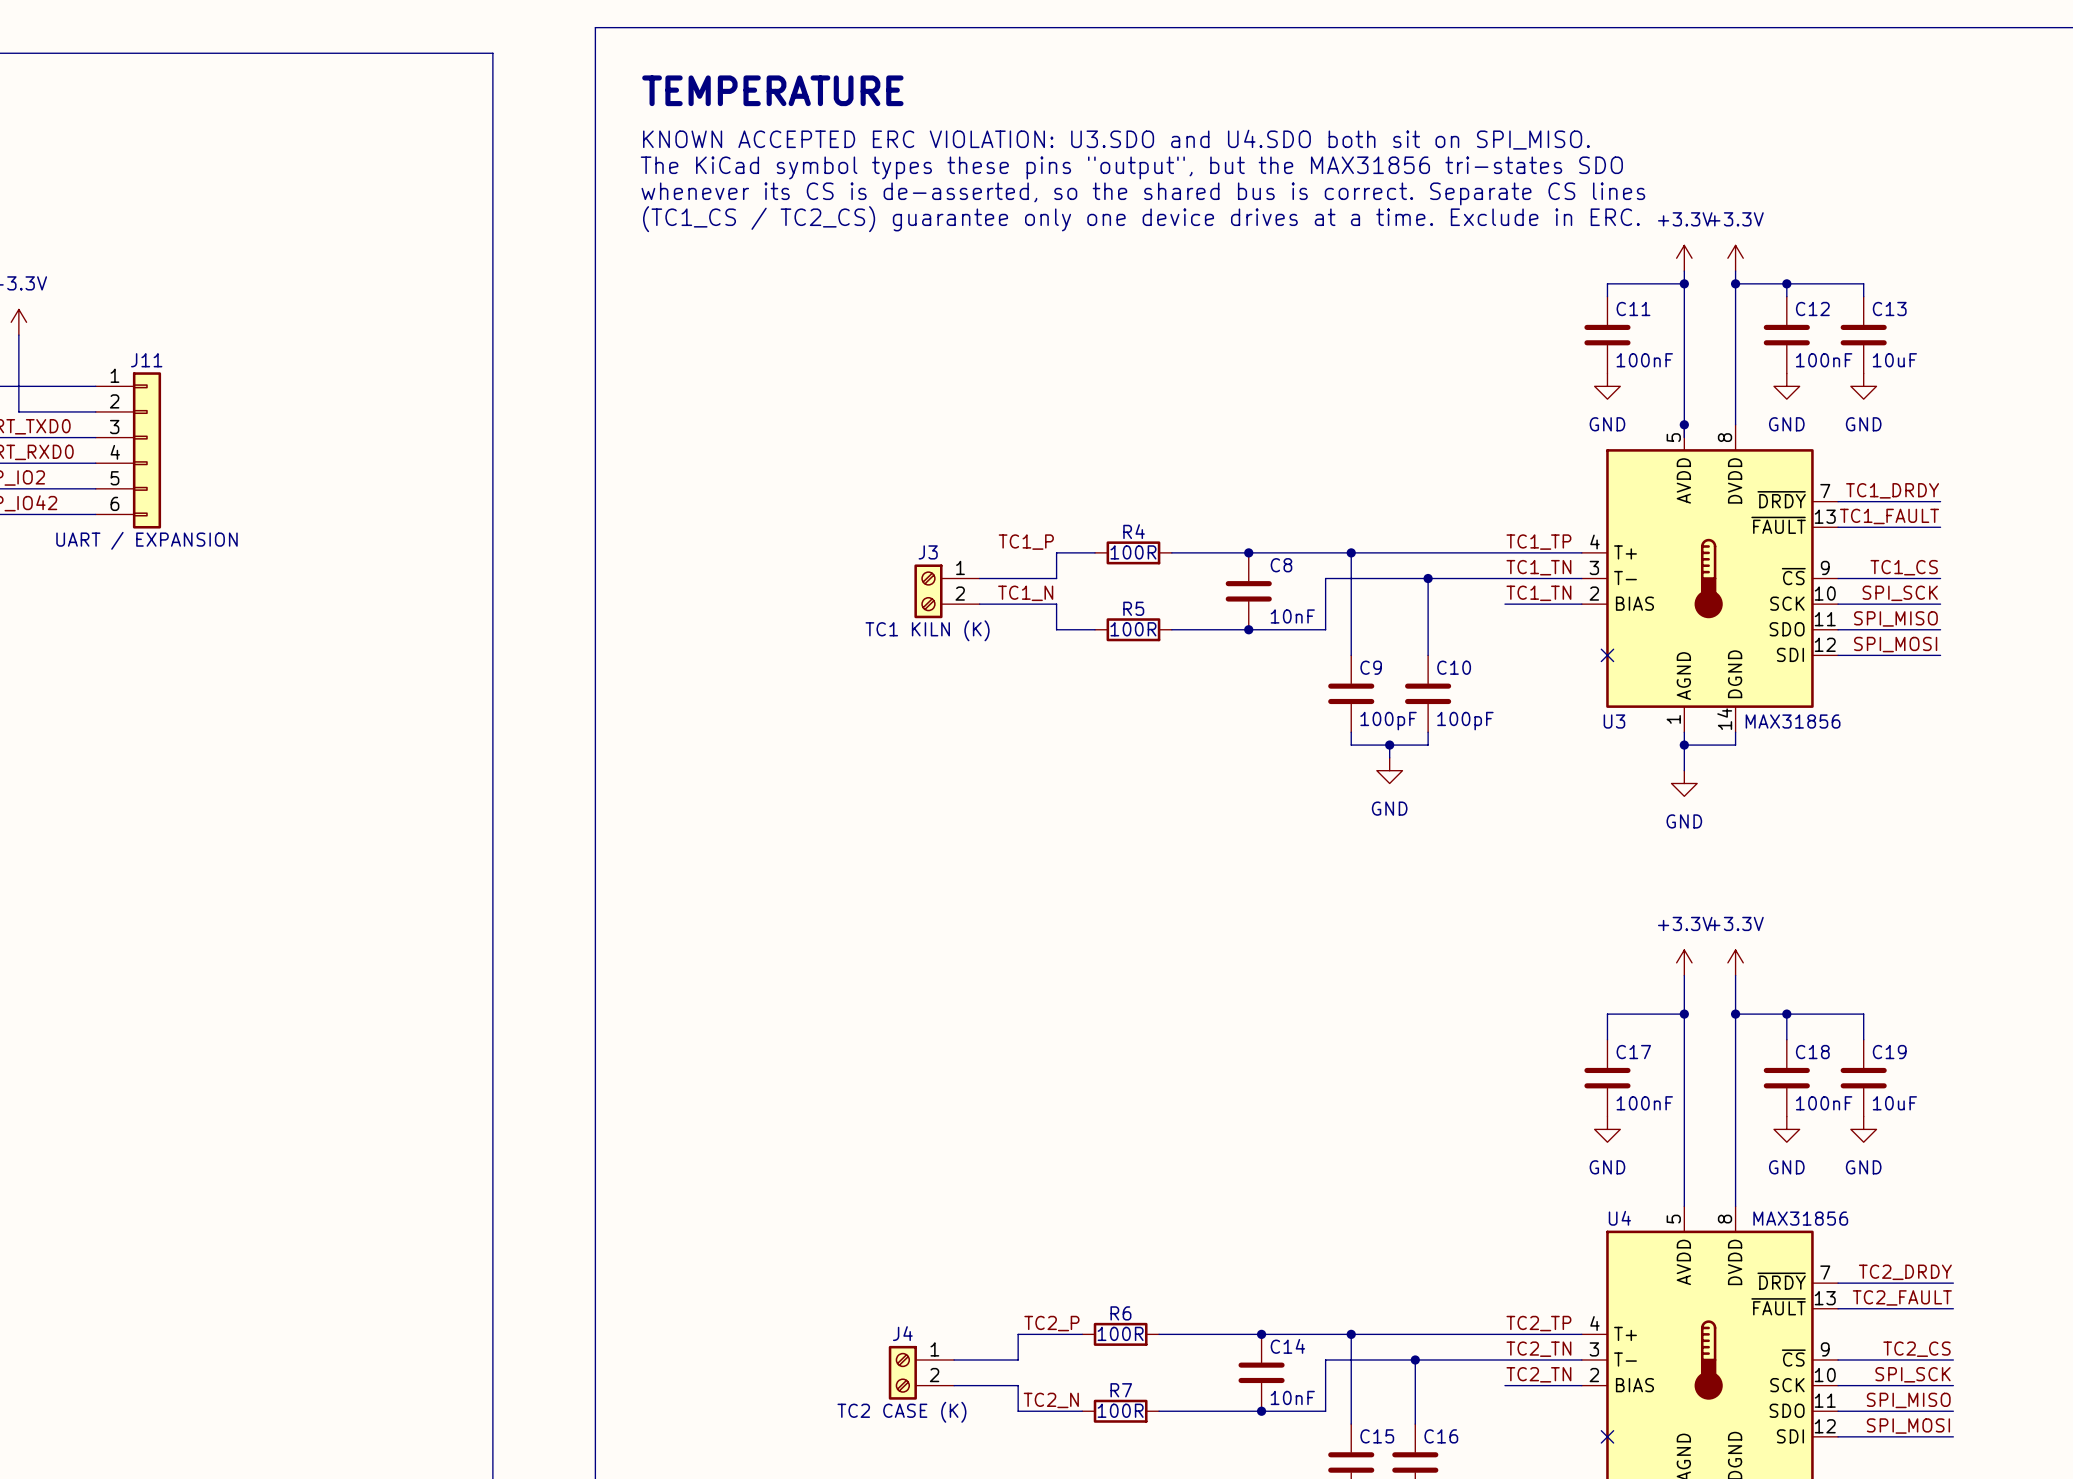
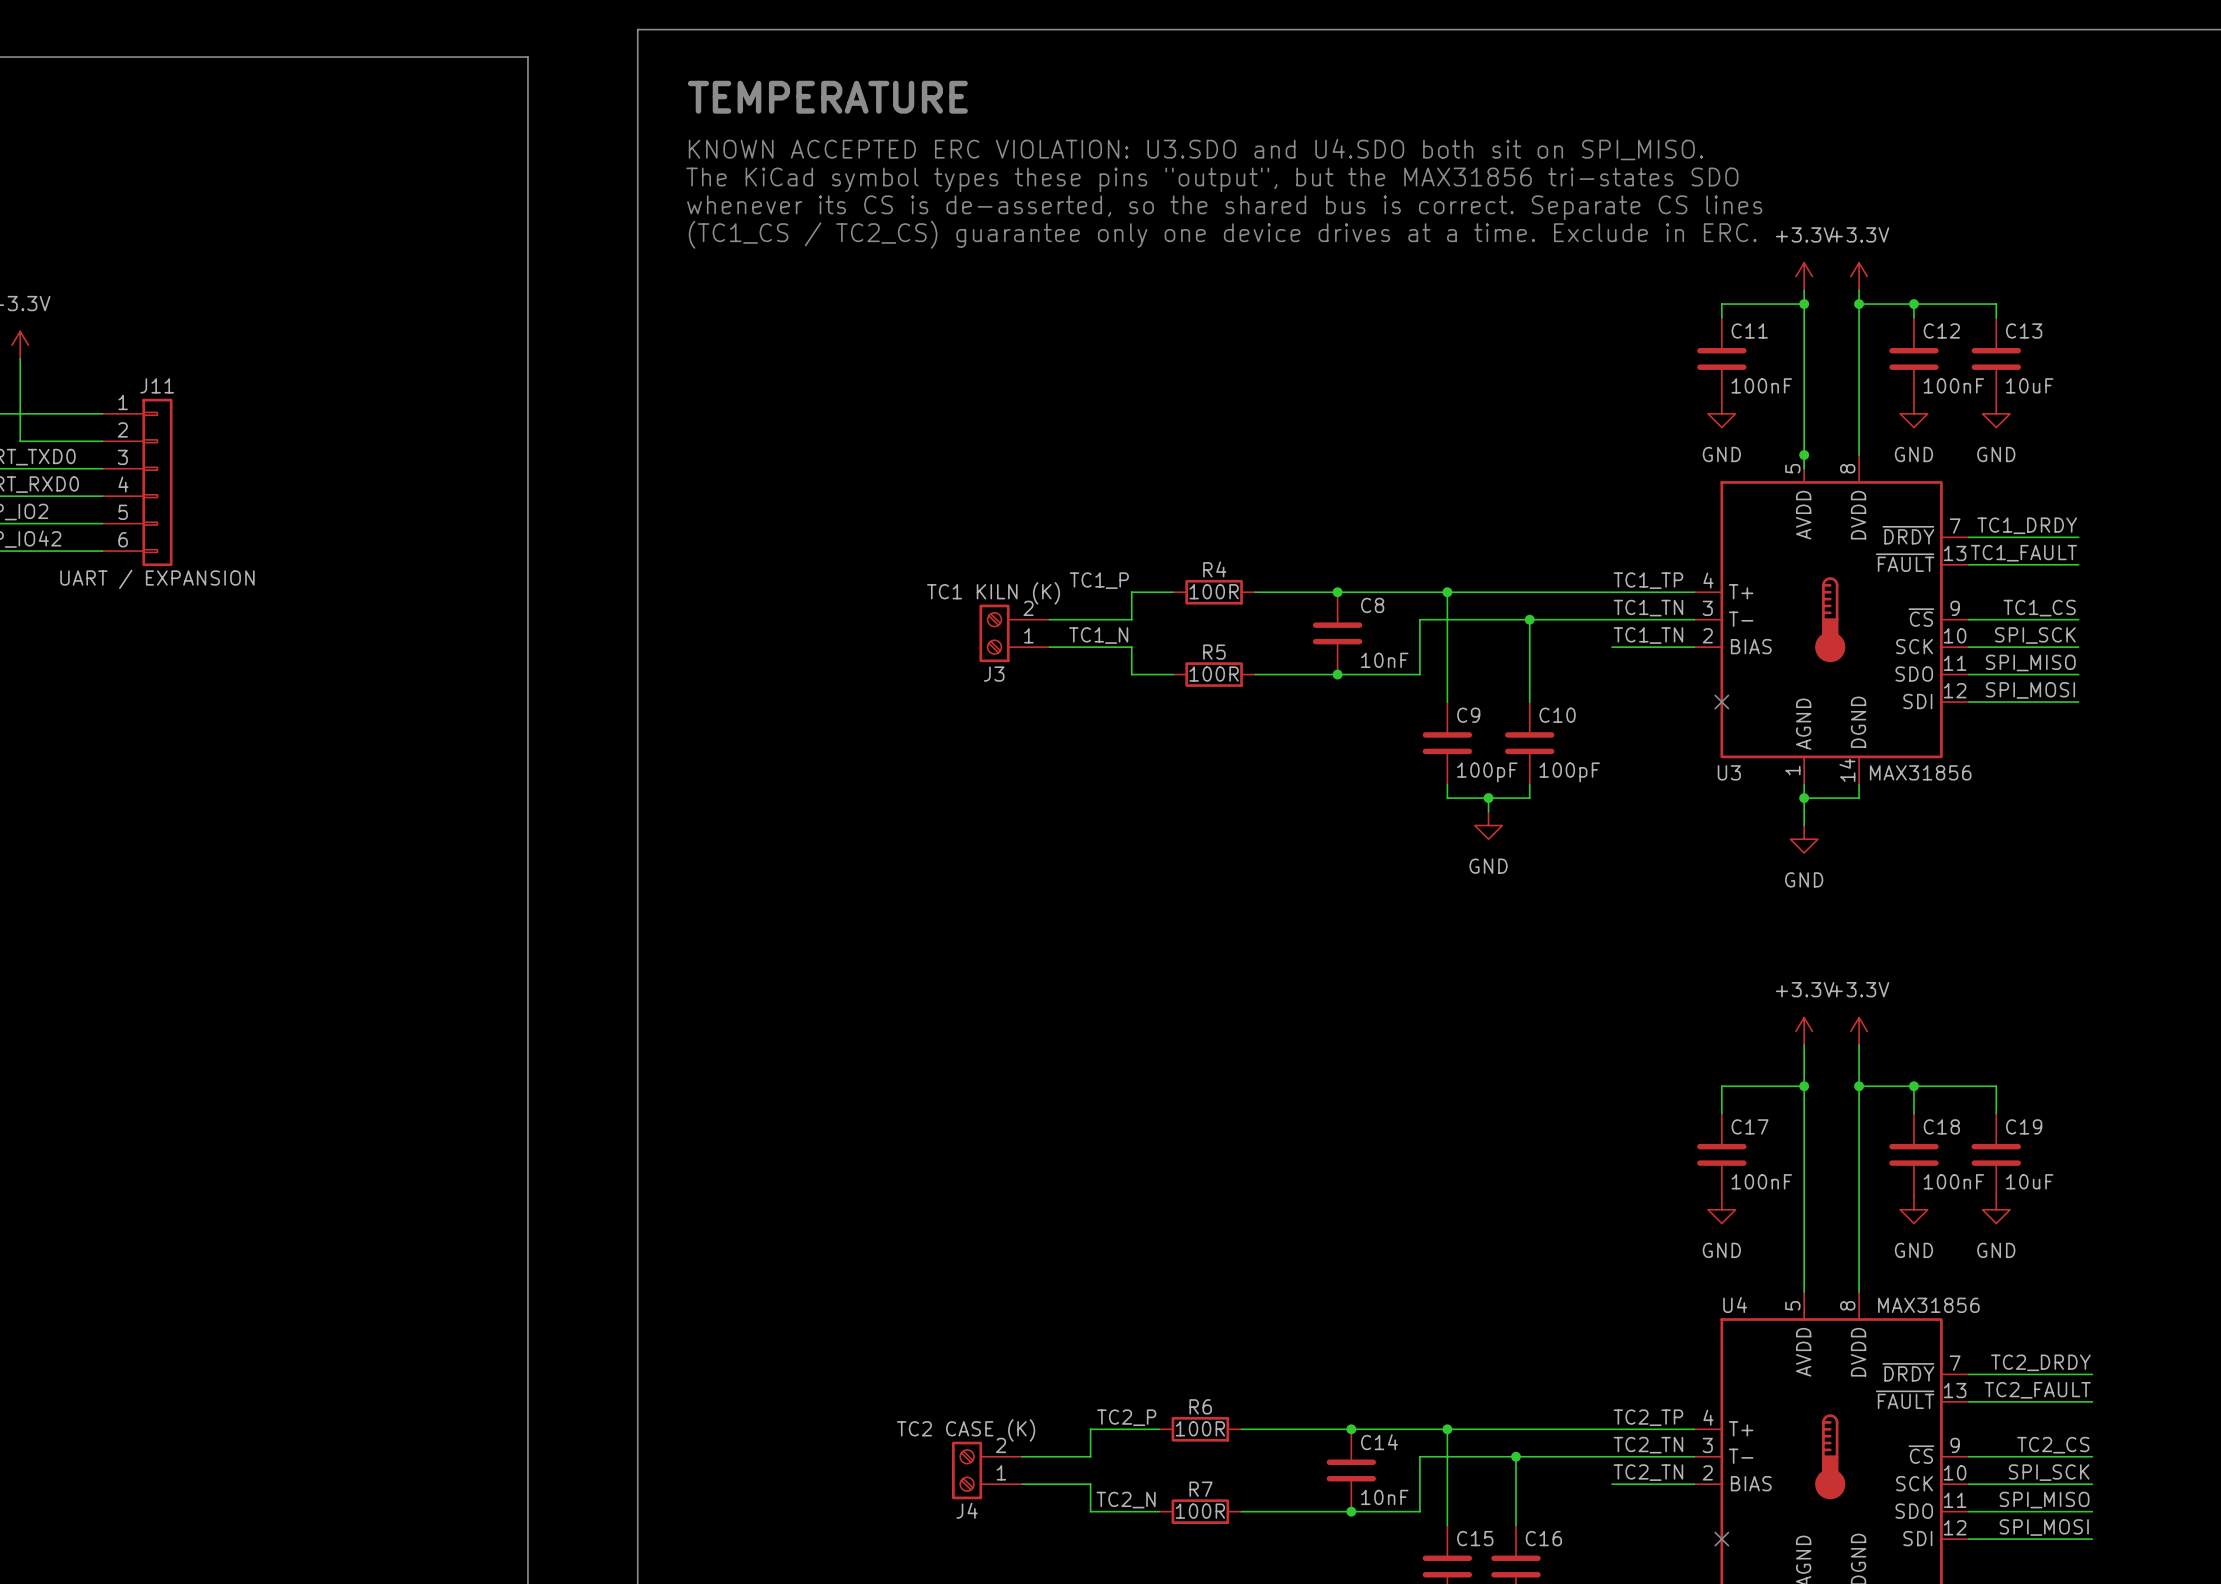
J3 flip: as is (928, 591) -> up-down (994, 633)
J4 flip: as is (902, 1372) -> up-down (967, 1470)

